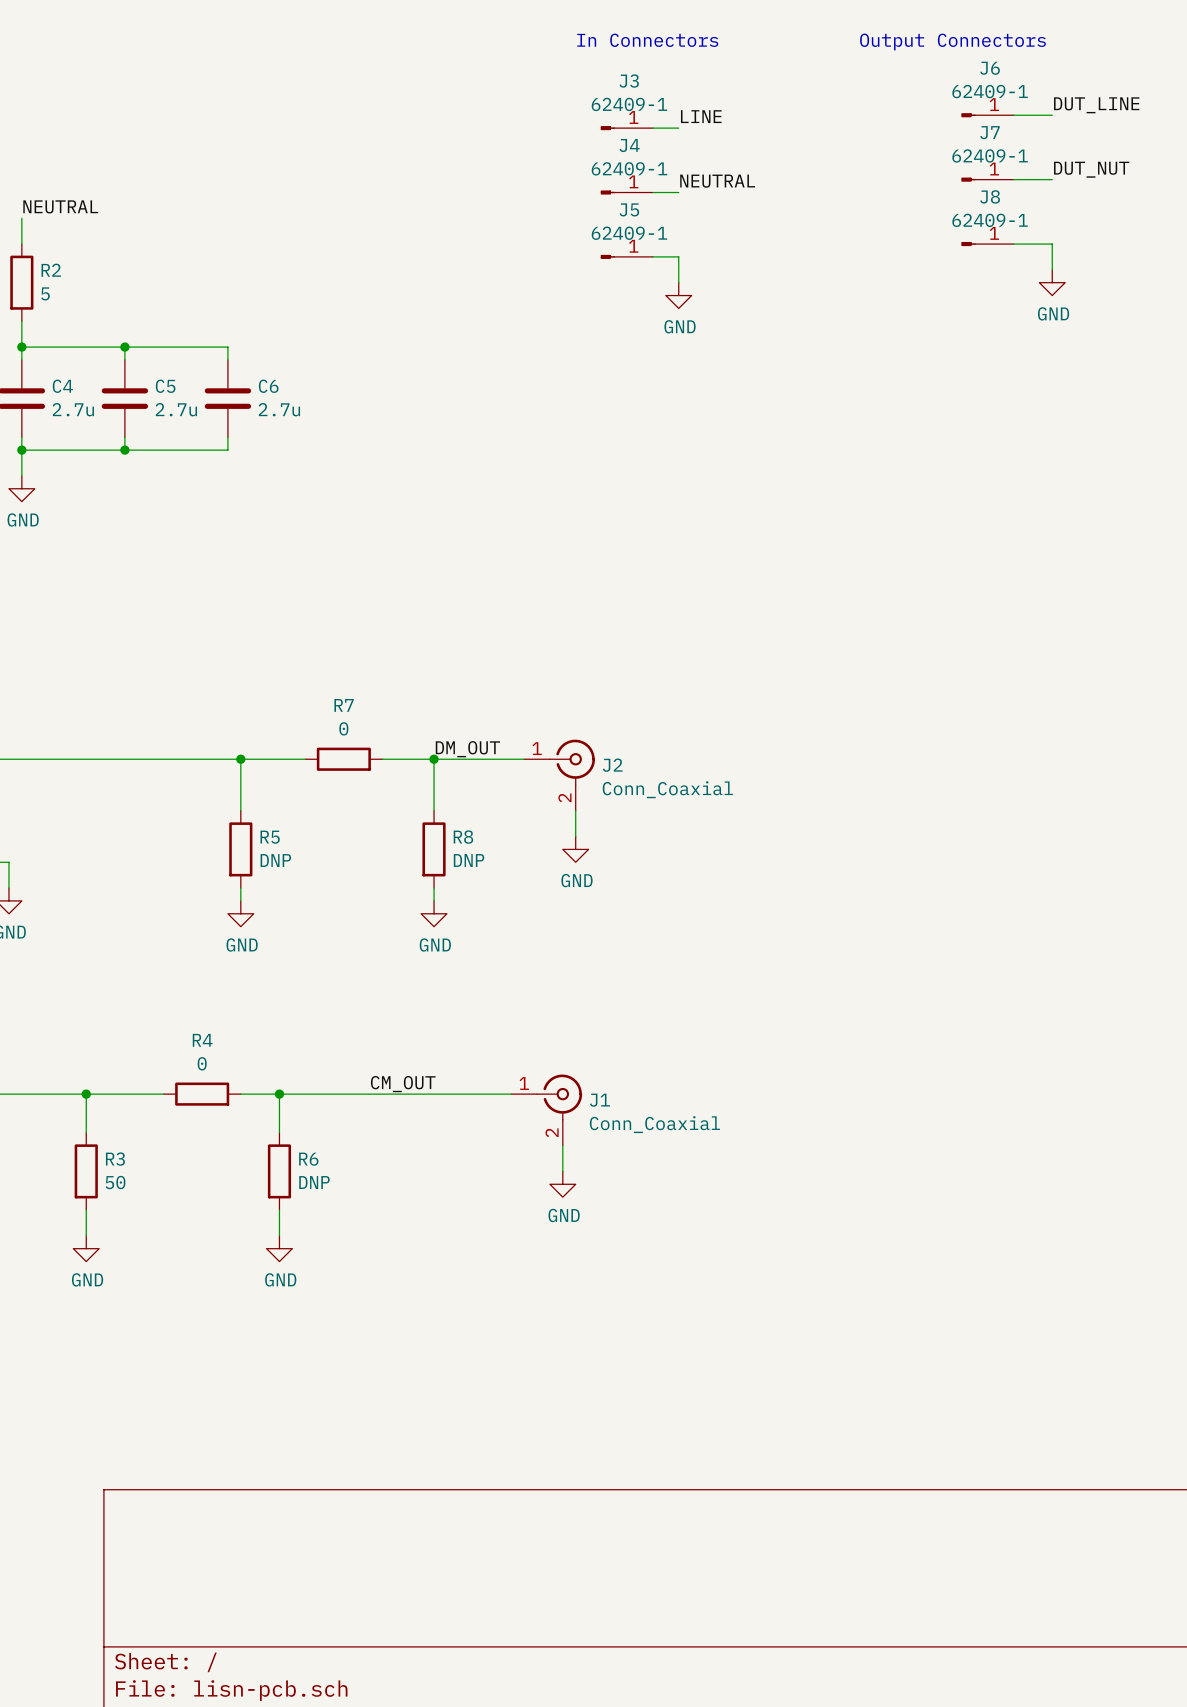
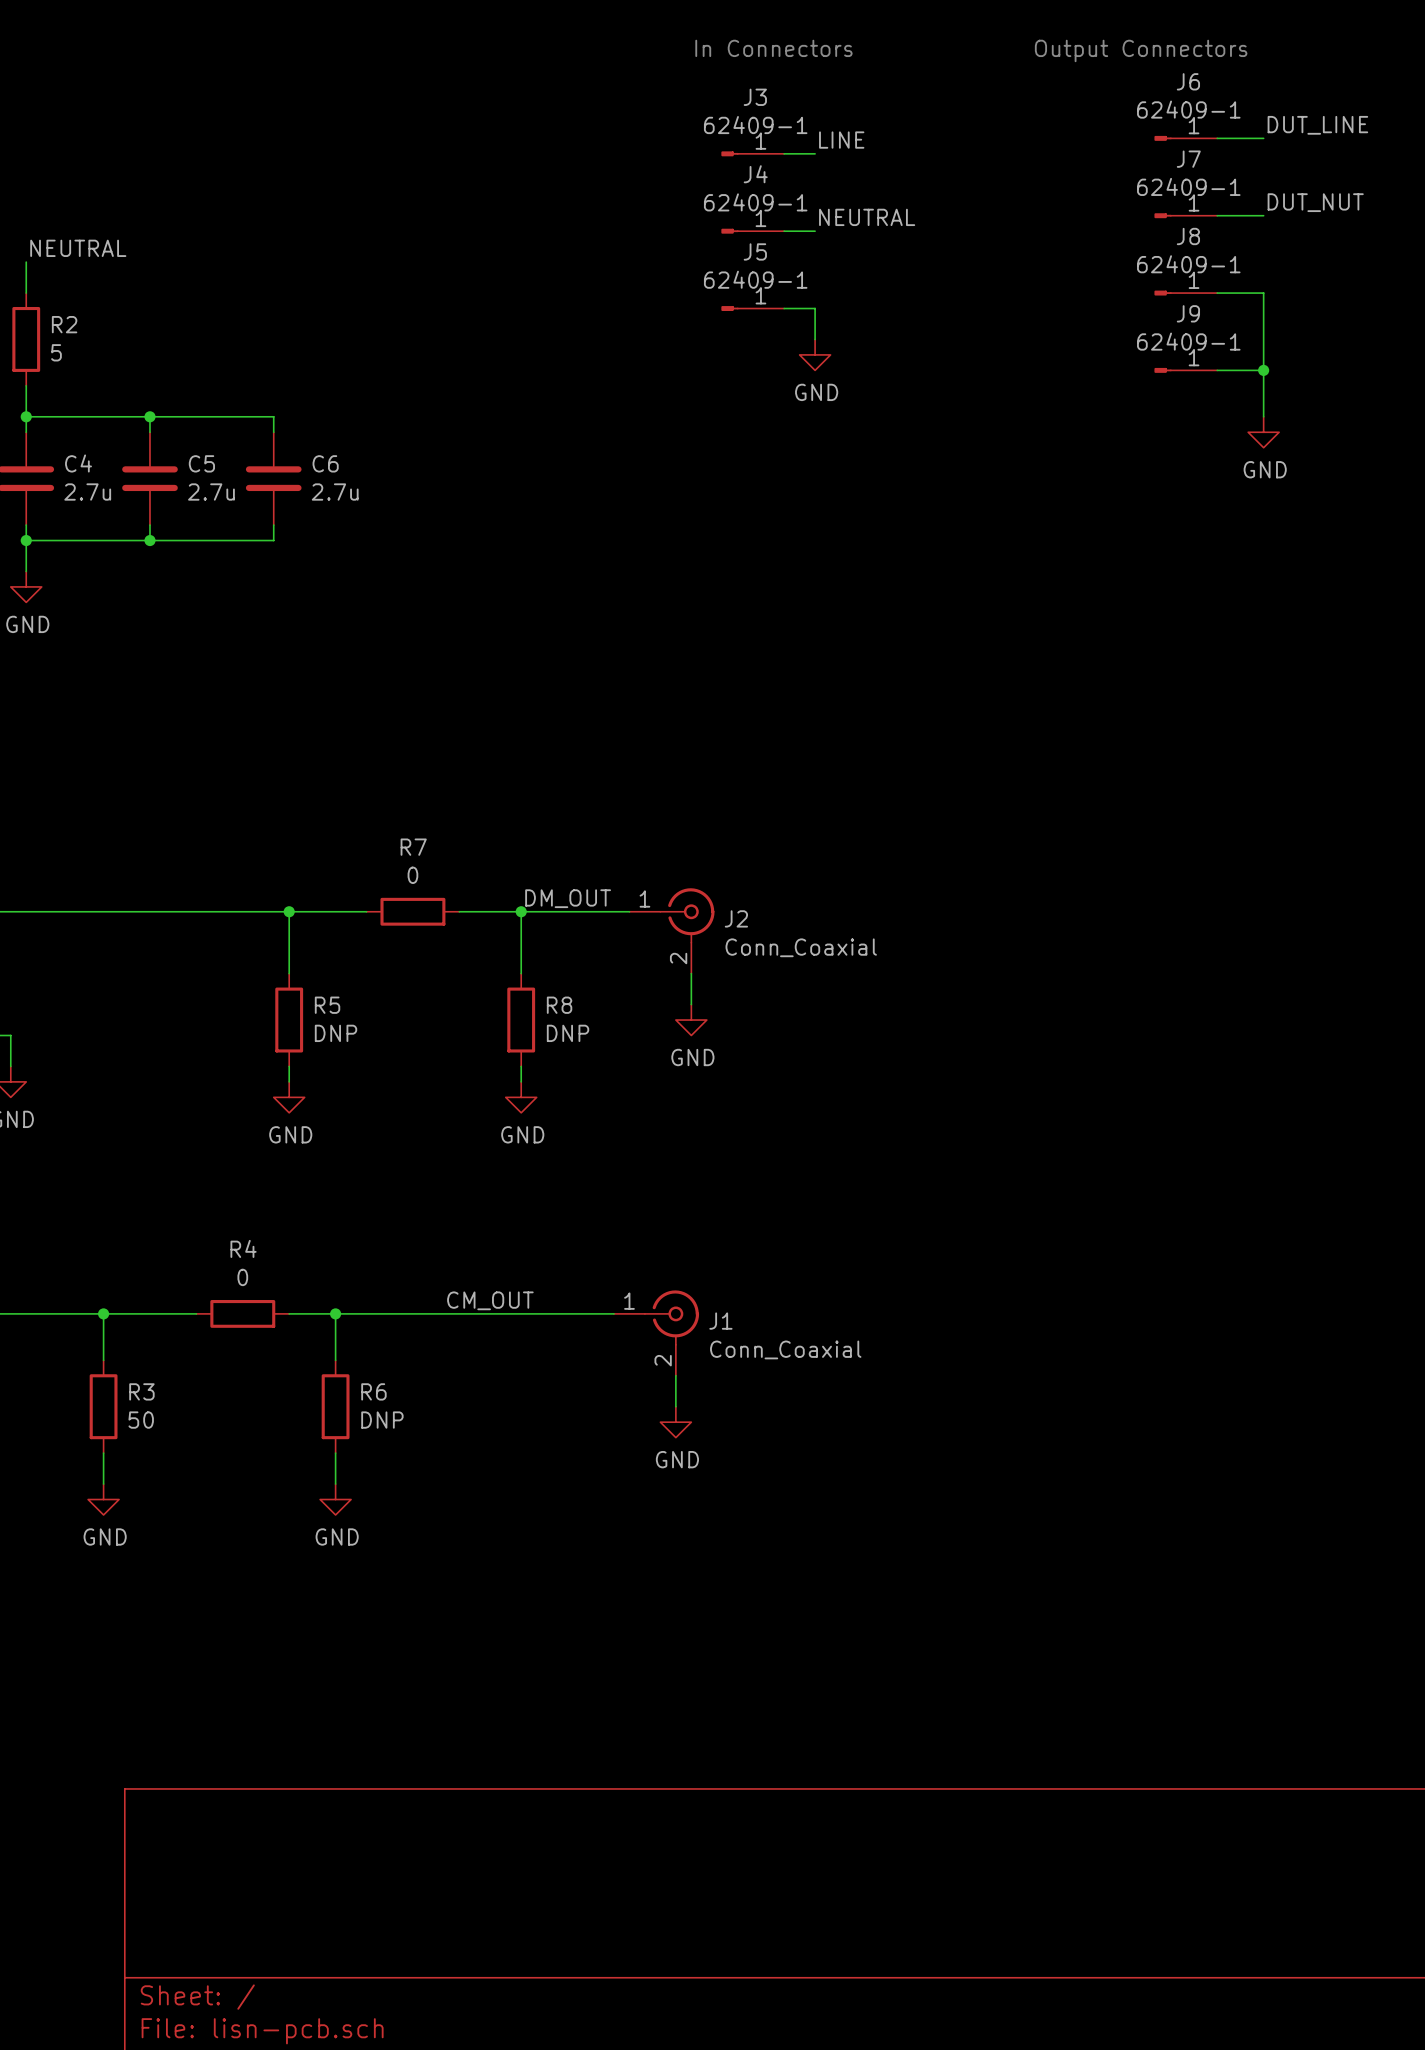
wire: none -> (1263, 323) (1263, 416)
power symbol position: GND (1052, 282) -> GND (1263, 432)
J9: none -> 62409-1 (1185, 370)
wire: none -> (1217, 370) (1263, 370)
junction: none -> (1263, 370)

